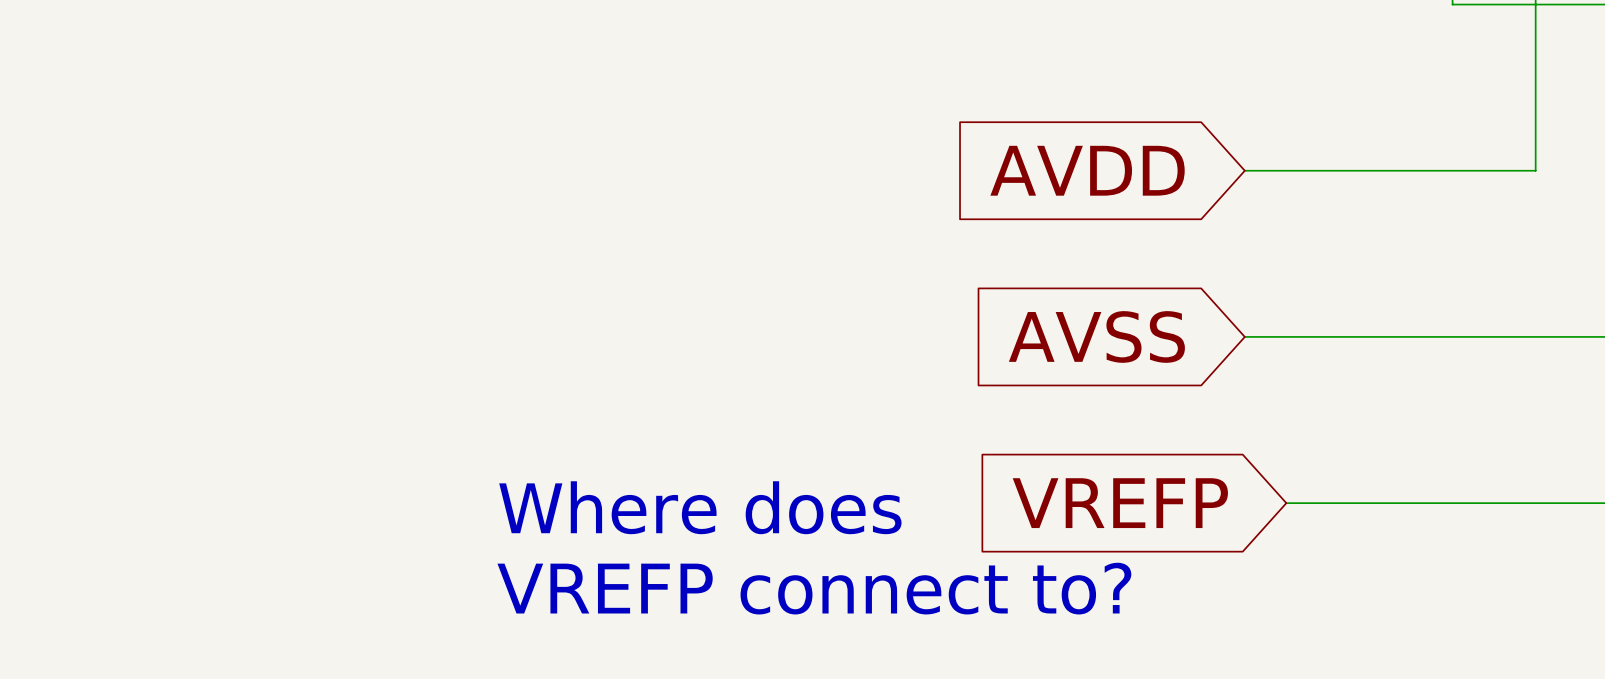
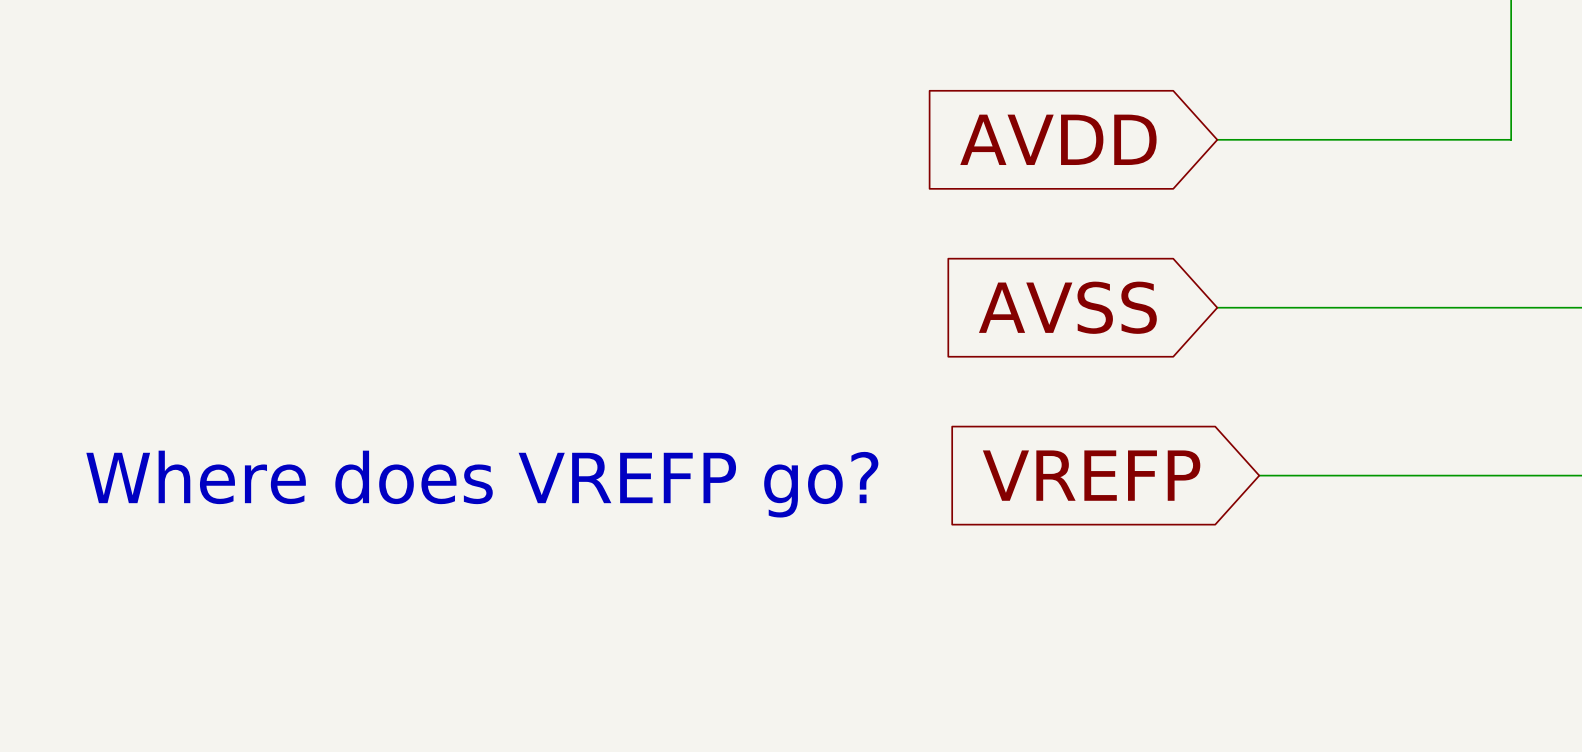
text: Where does (700, 507) -> Where does VREFP go? (482, 484)
text: VREFP connect to? (814, 588) -> none

